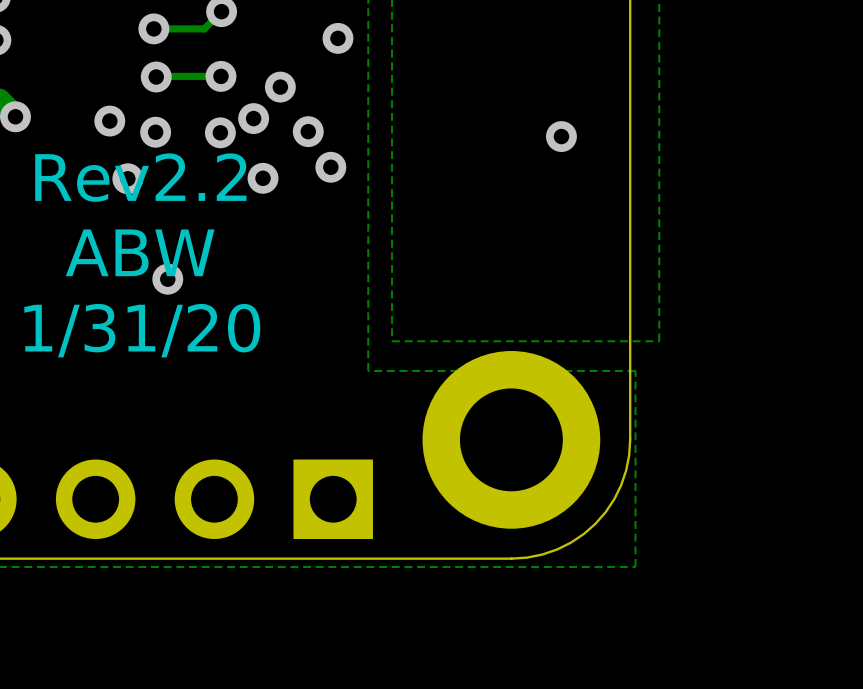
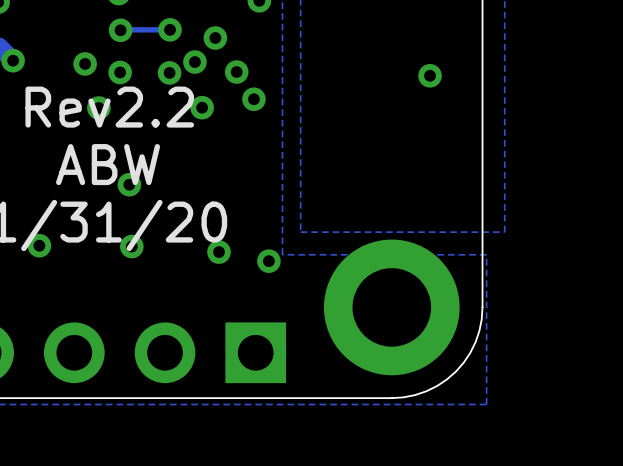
via: none -> (39, 245)
via: none -> (131, 246)
via: none -> (219, 252)
via: none -> (268, 261)

